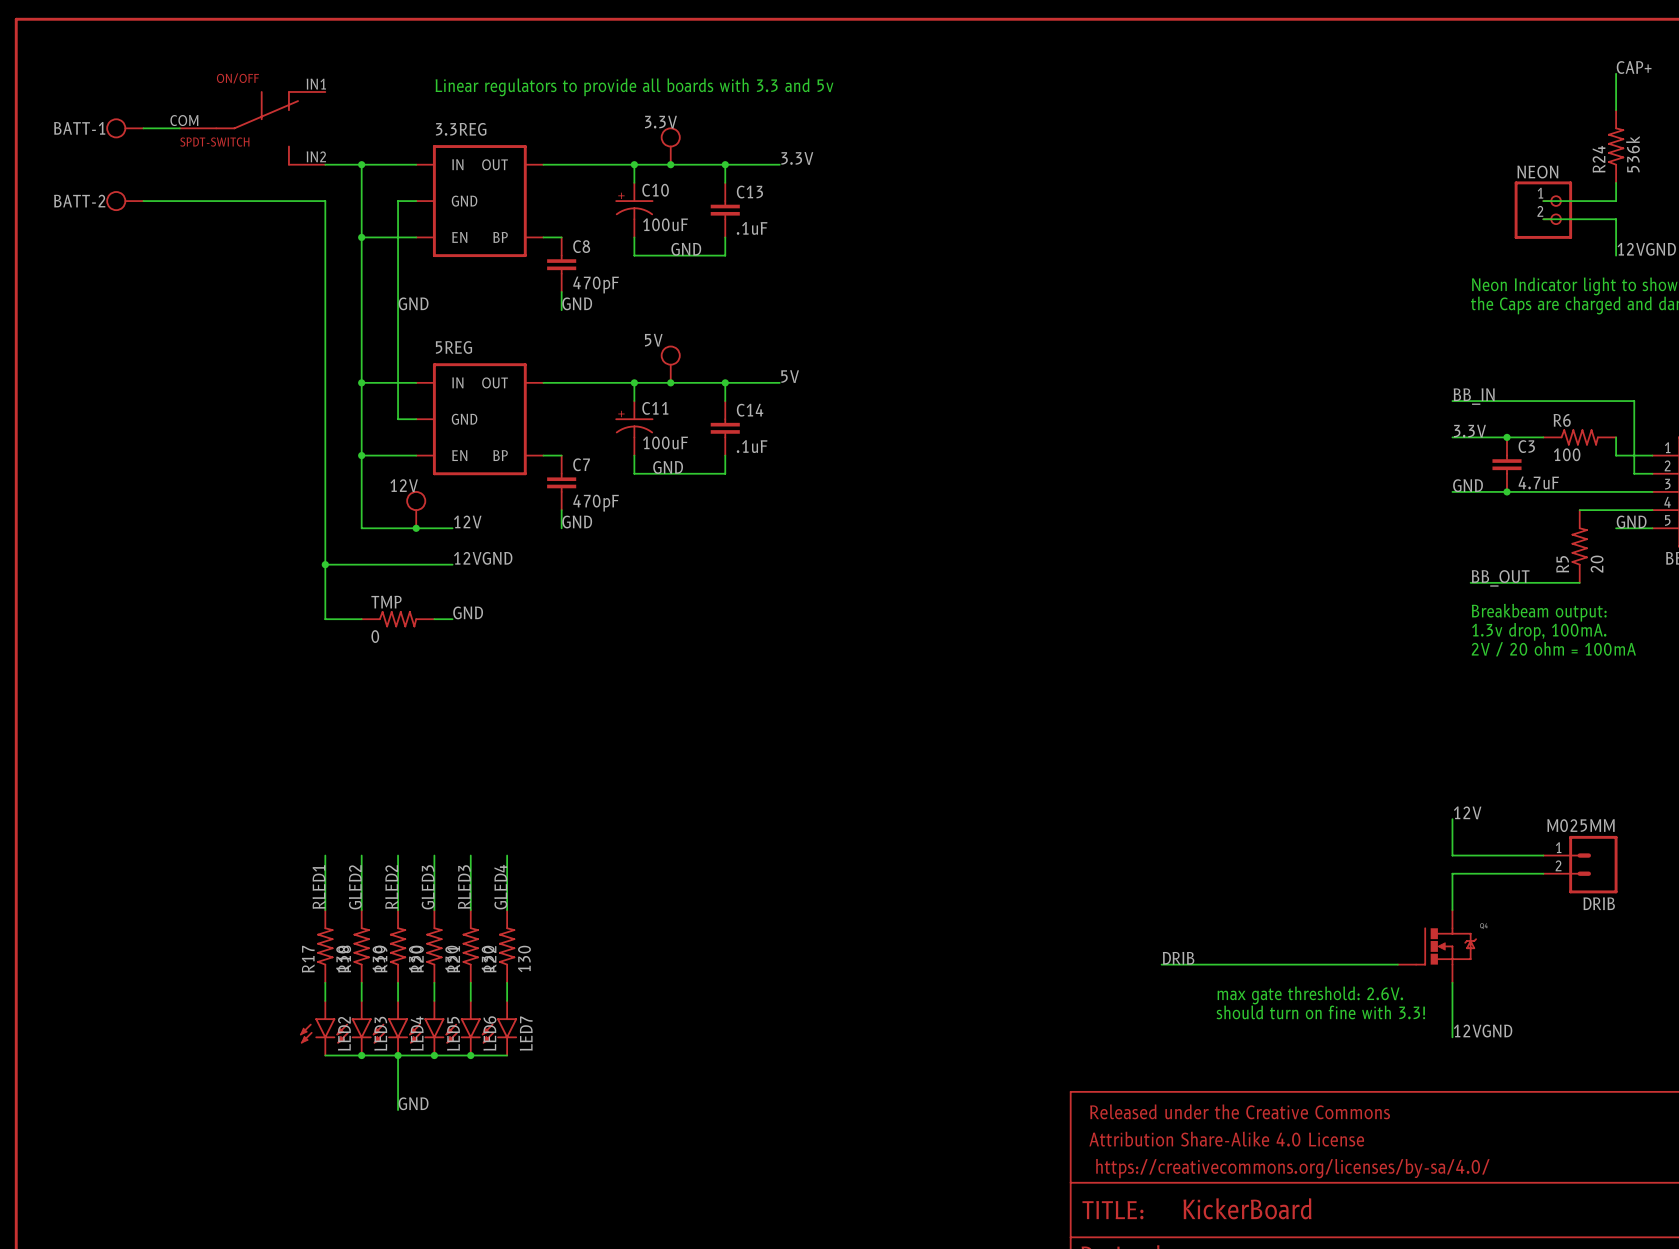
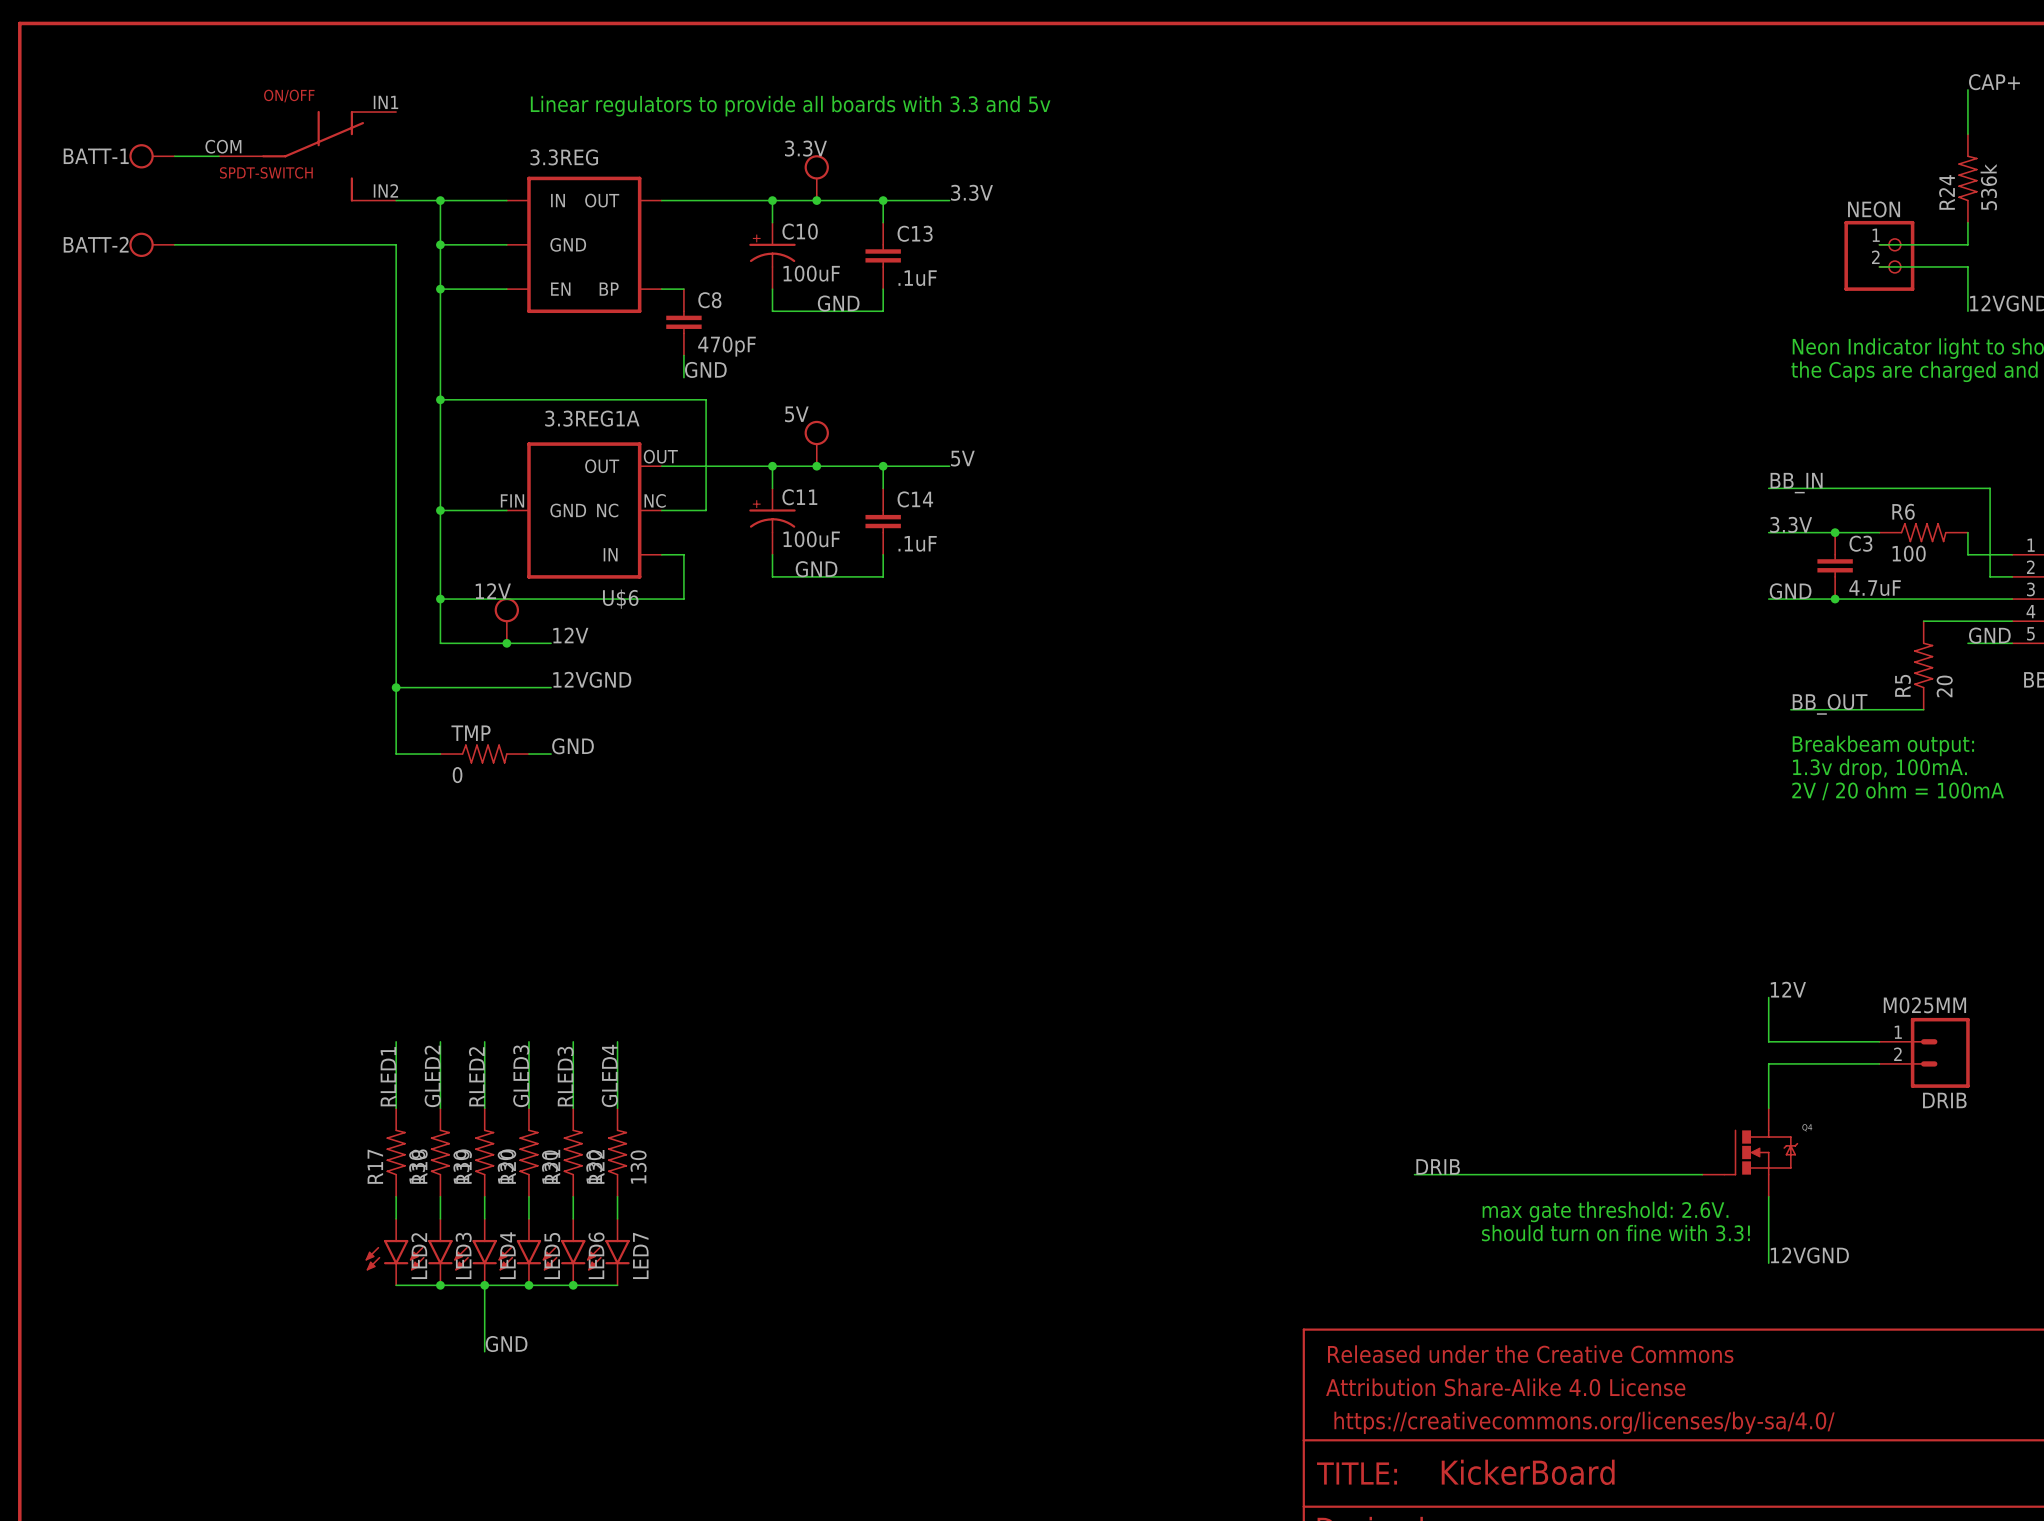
junction: none -> (440, 244)
wire: (398, 201) (398, 419) -> (484, 244) (440, 244)
label: GND (413, 303) -> none
wire: none -> (440, 399) (706, 399) (706, 510) (661, 510)
junction: none -> (440, 399)
wire: (361, 382) (416, 382) -> none
junction: (361, 382) -> none
wire: none -> (440, 510) (484, 510)
junction: none -> (440, 510)
5REG: (479, 419) -> none
U$6: none -> 3.3REG1A (584, 510)
wire: (361, 455) (416, 455) -> none
junction: (361, 455) -> none
wire: none -> (683, 554) (683, 599) (440, 599)
C7: 470pF (561, 482) -> none
junction: none -> (440, 599)
wire: (561, 510) (561, 528) -> none
label: GND (577, 522) -> none

